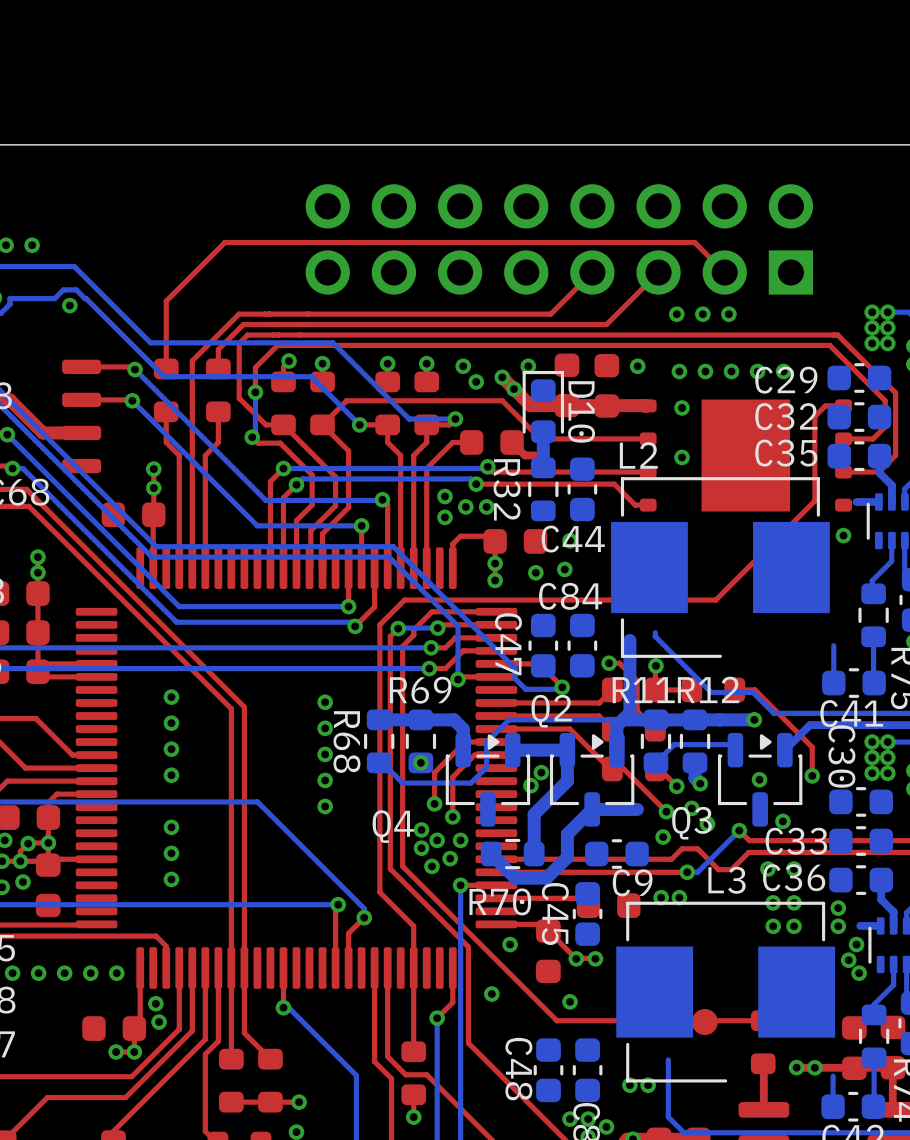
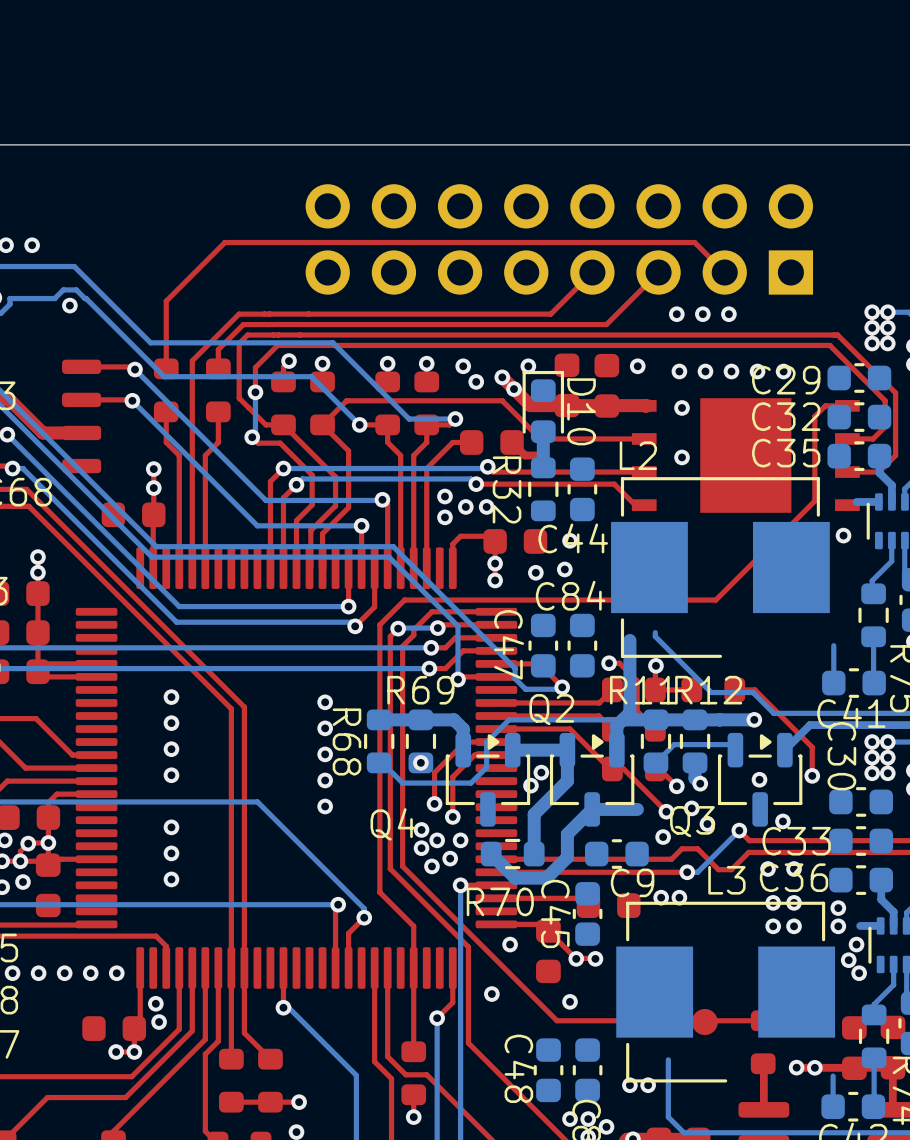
part footprint: [639, 399, 852, 512] -> [631, 398, 860, 513]

